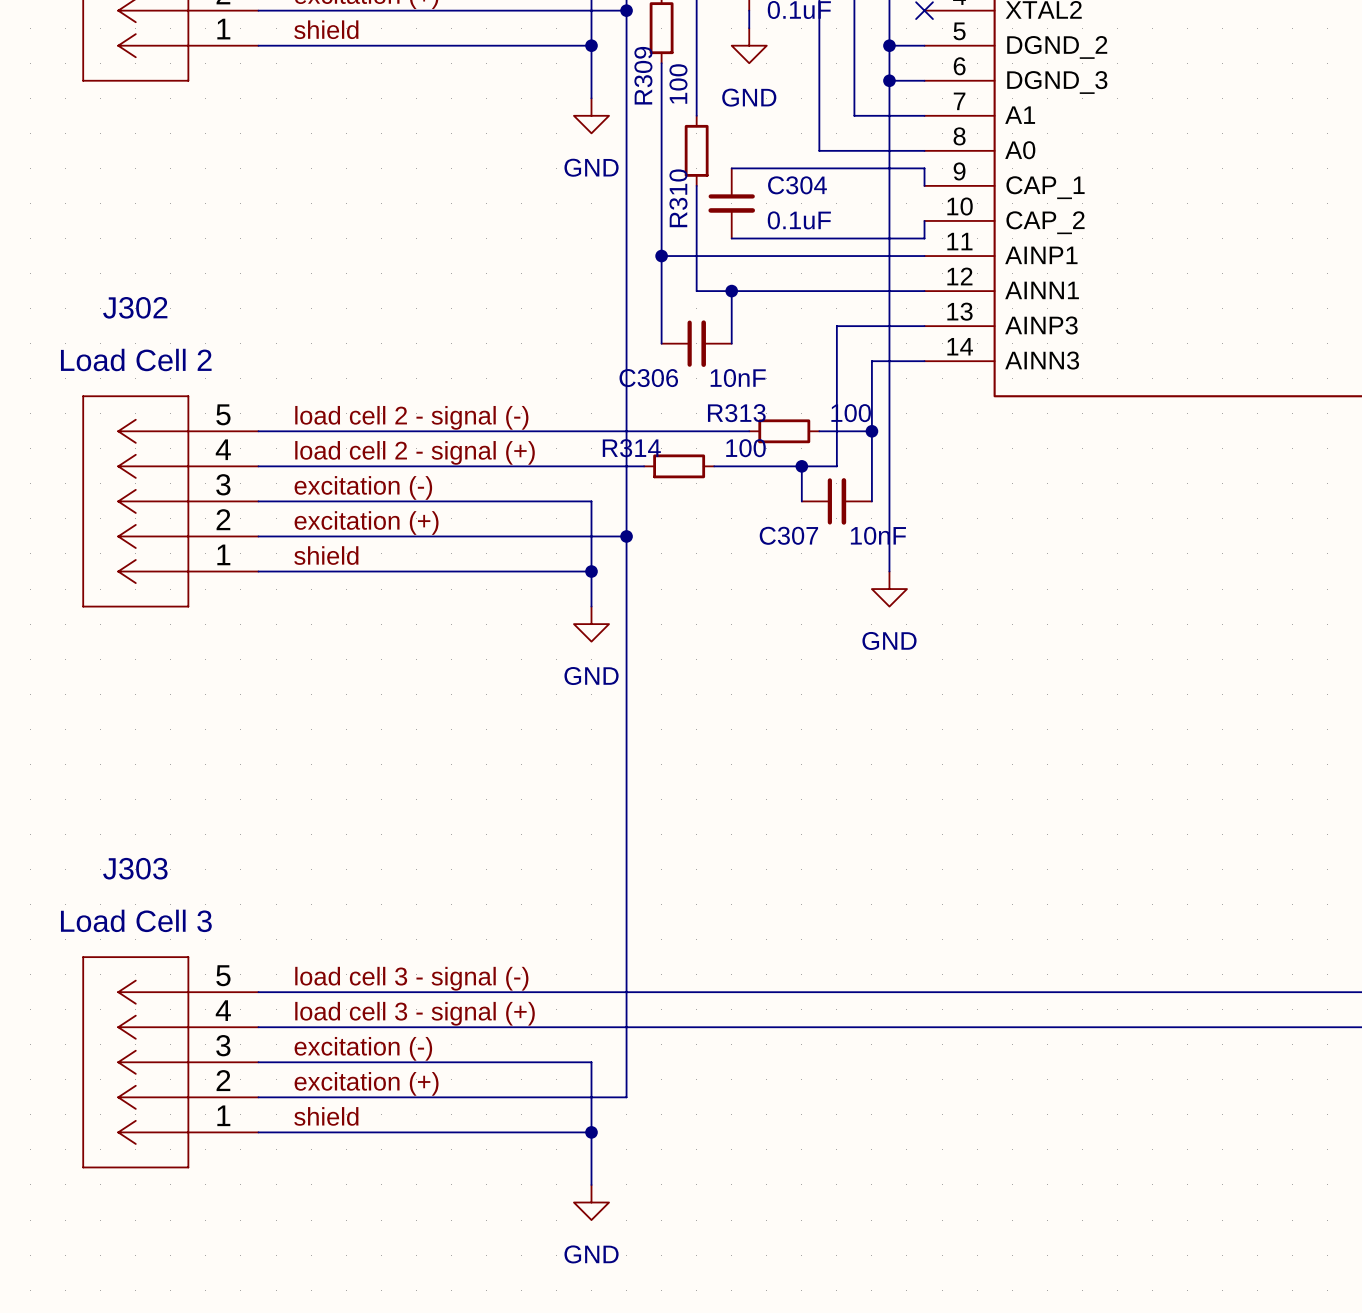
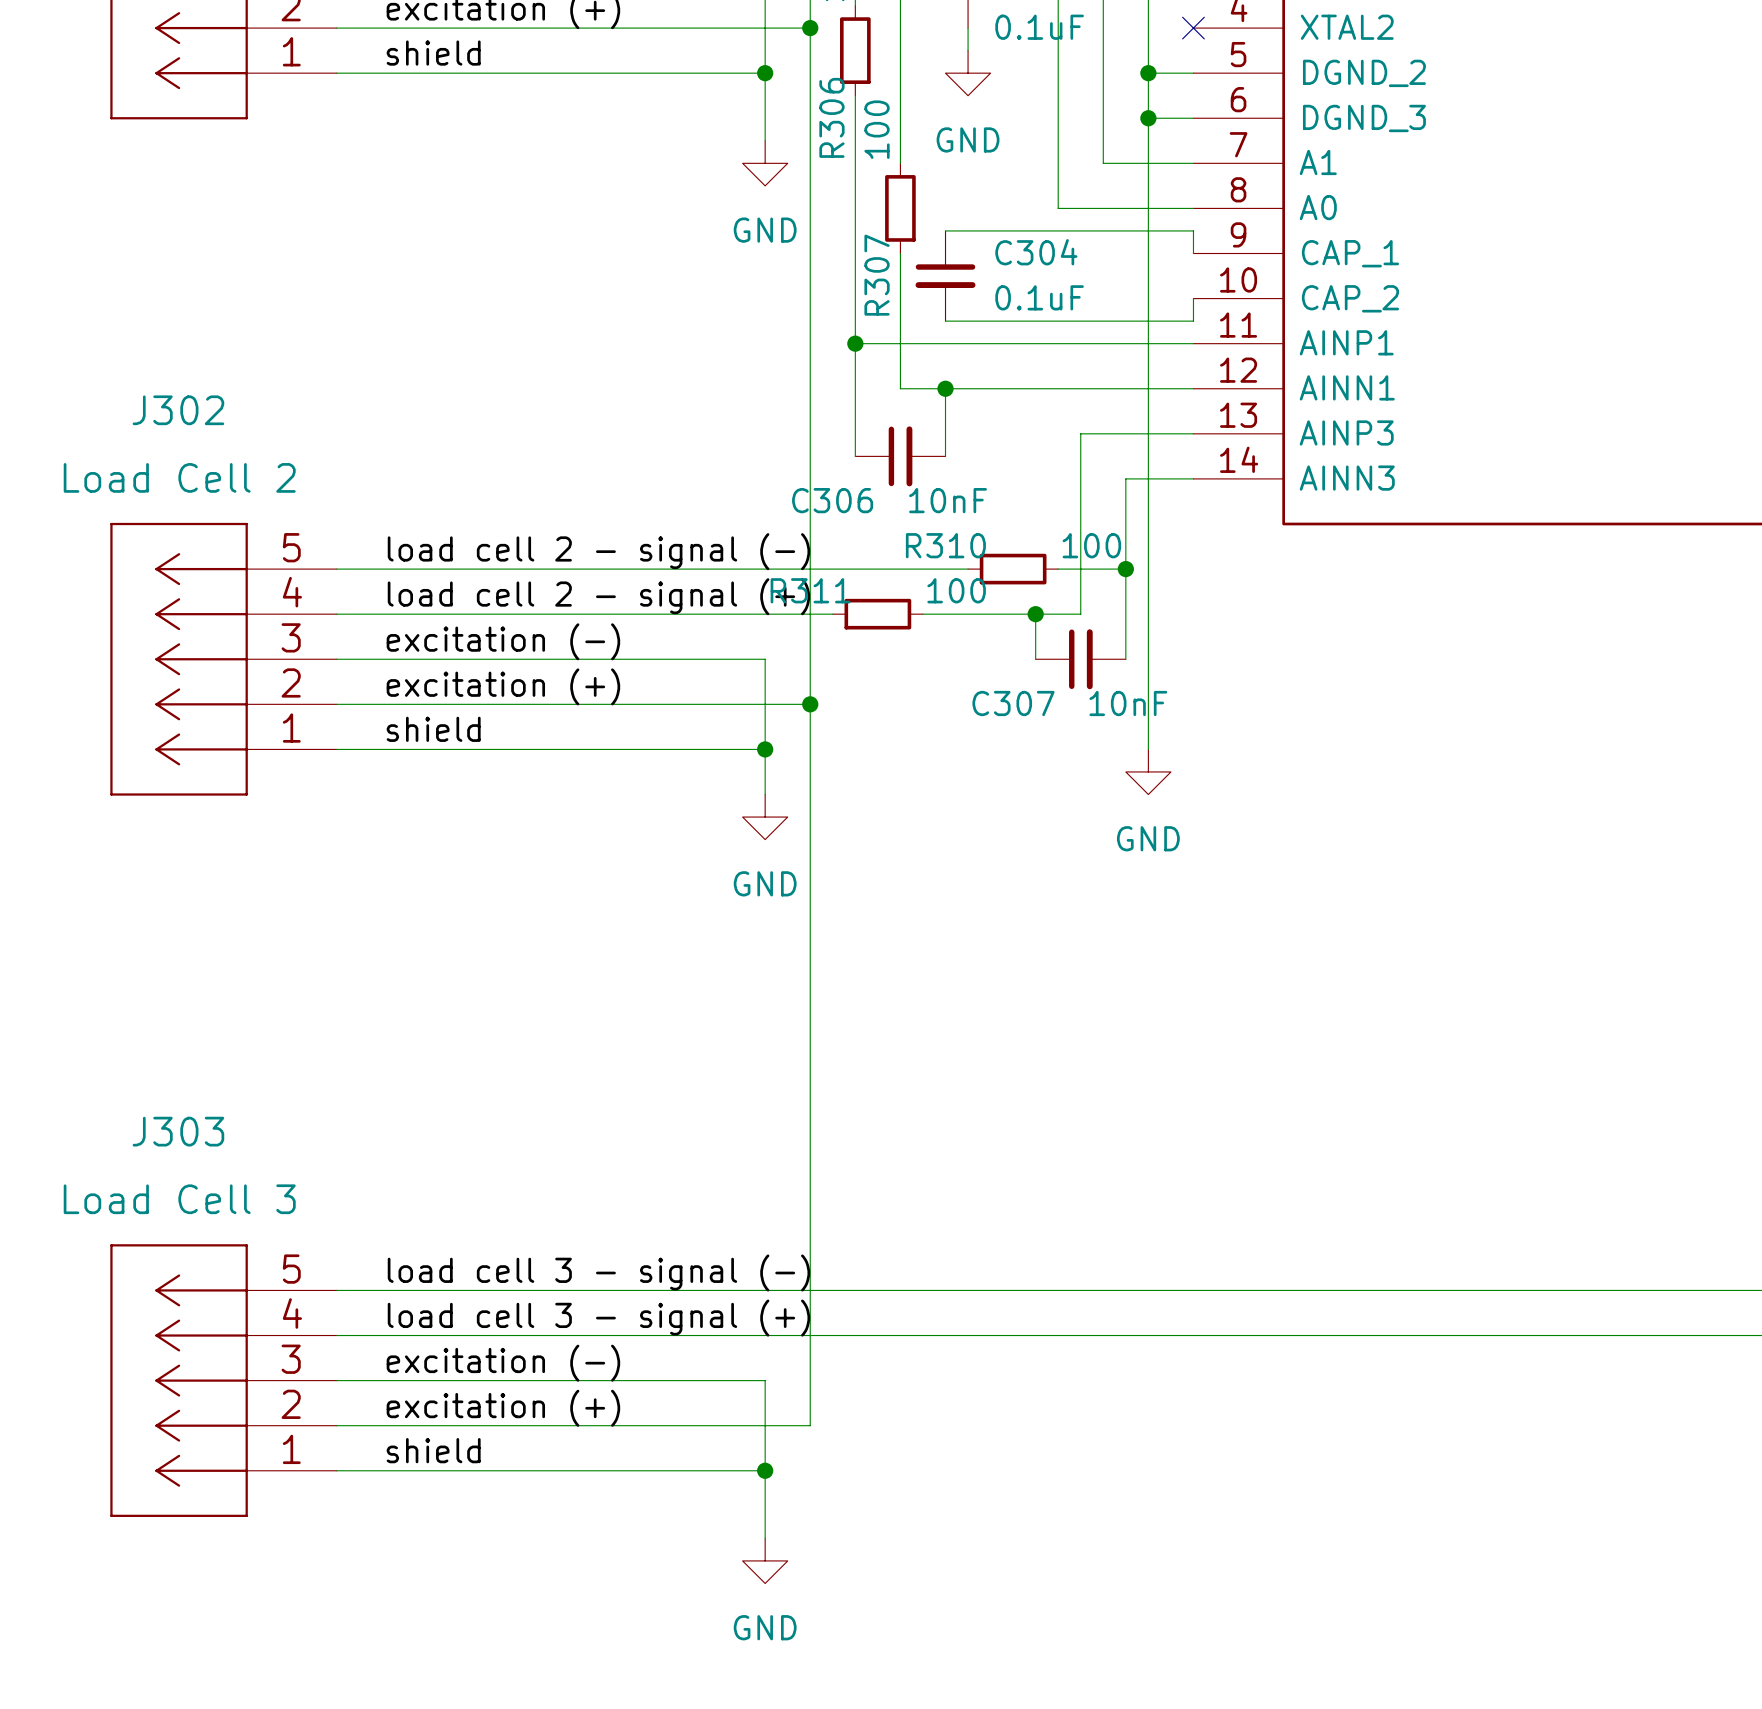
R309 name: R309 (643, 75) -> R306 (831, 117)
R310 name: R310 (678, 198) -> R307 (877, 275)
R313 name: R313 (736, 413) -> R310 (945, 545)
R314 name: R314 (631, 448) -> R311 (810, 590)

